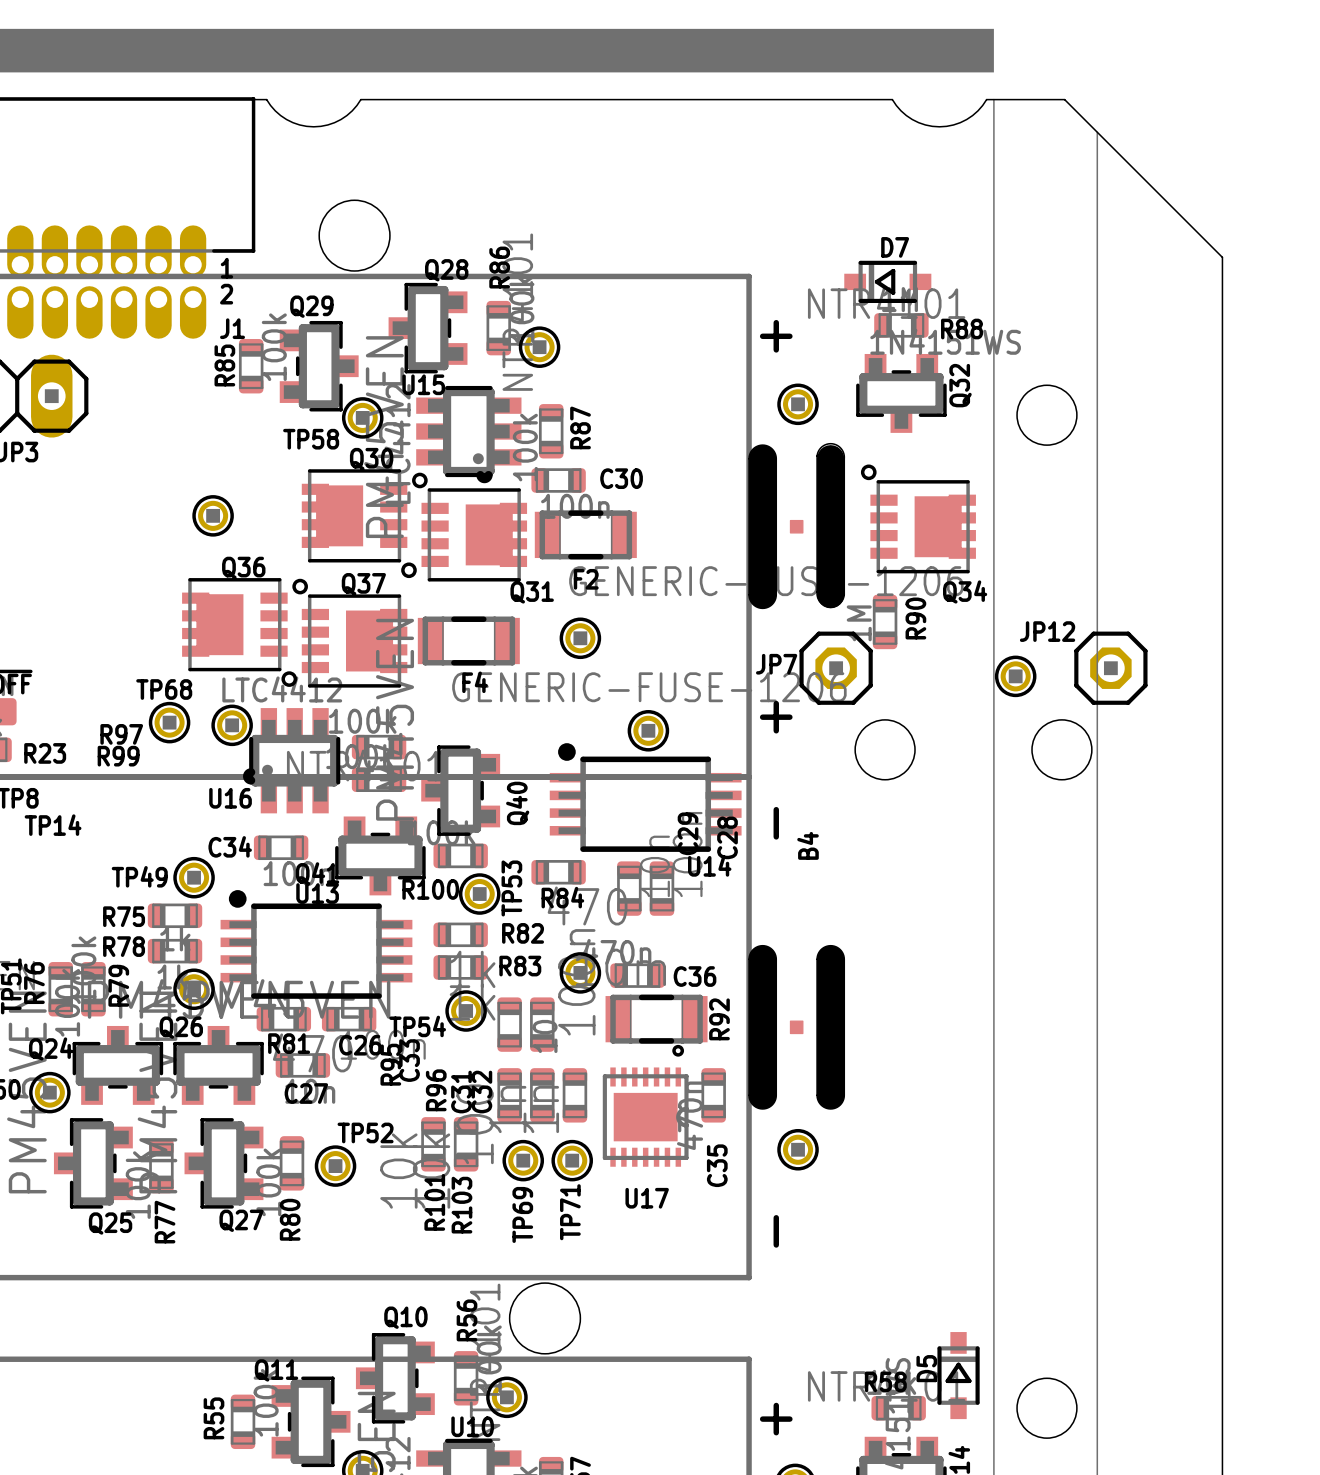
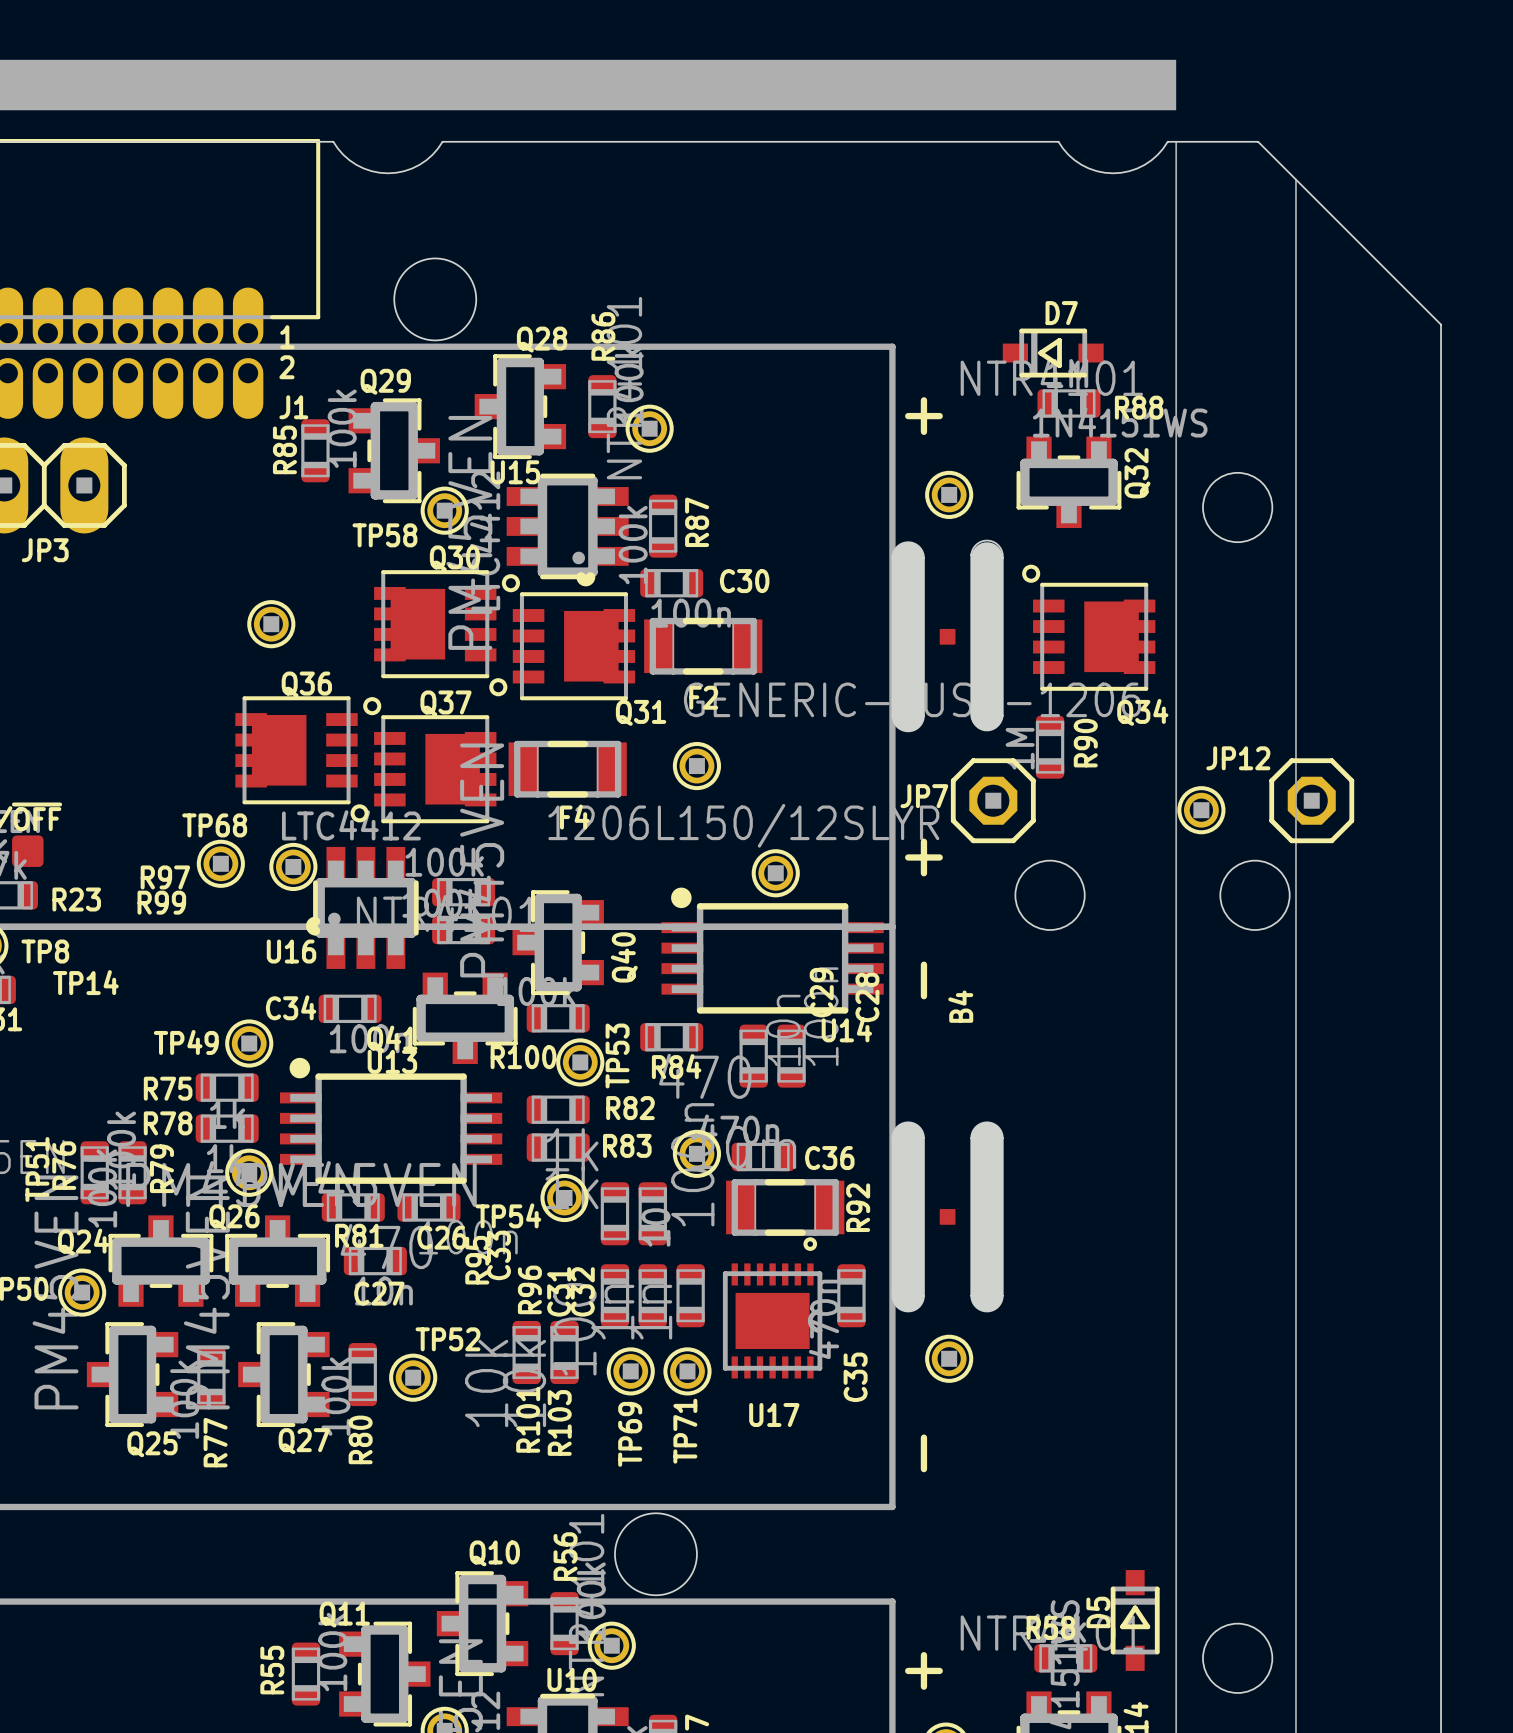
F4 value: GENERIC-FUSE-1206 (649, 687) -> 1206L150/12SLYR (743, 825)

